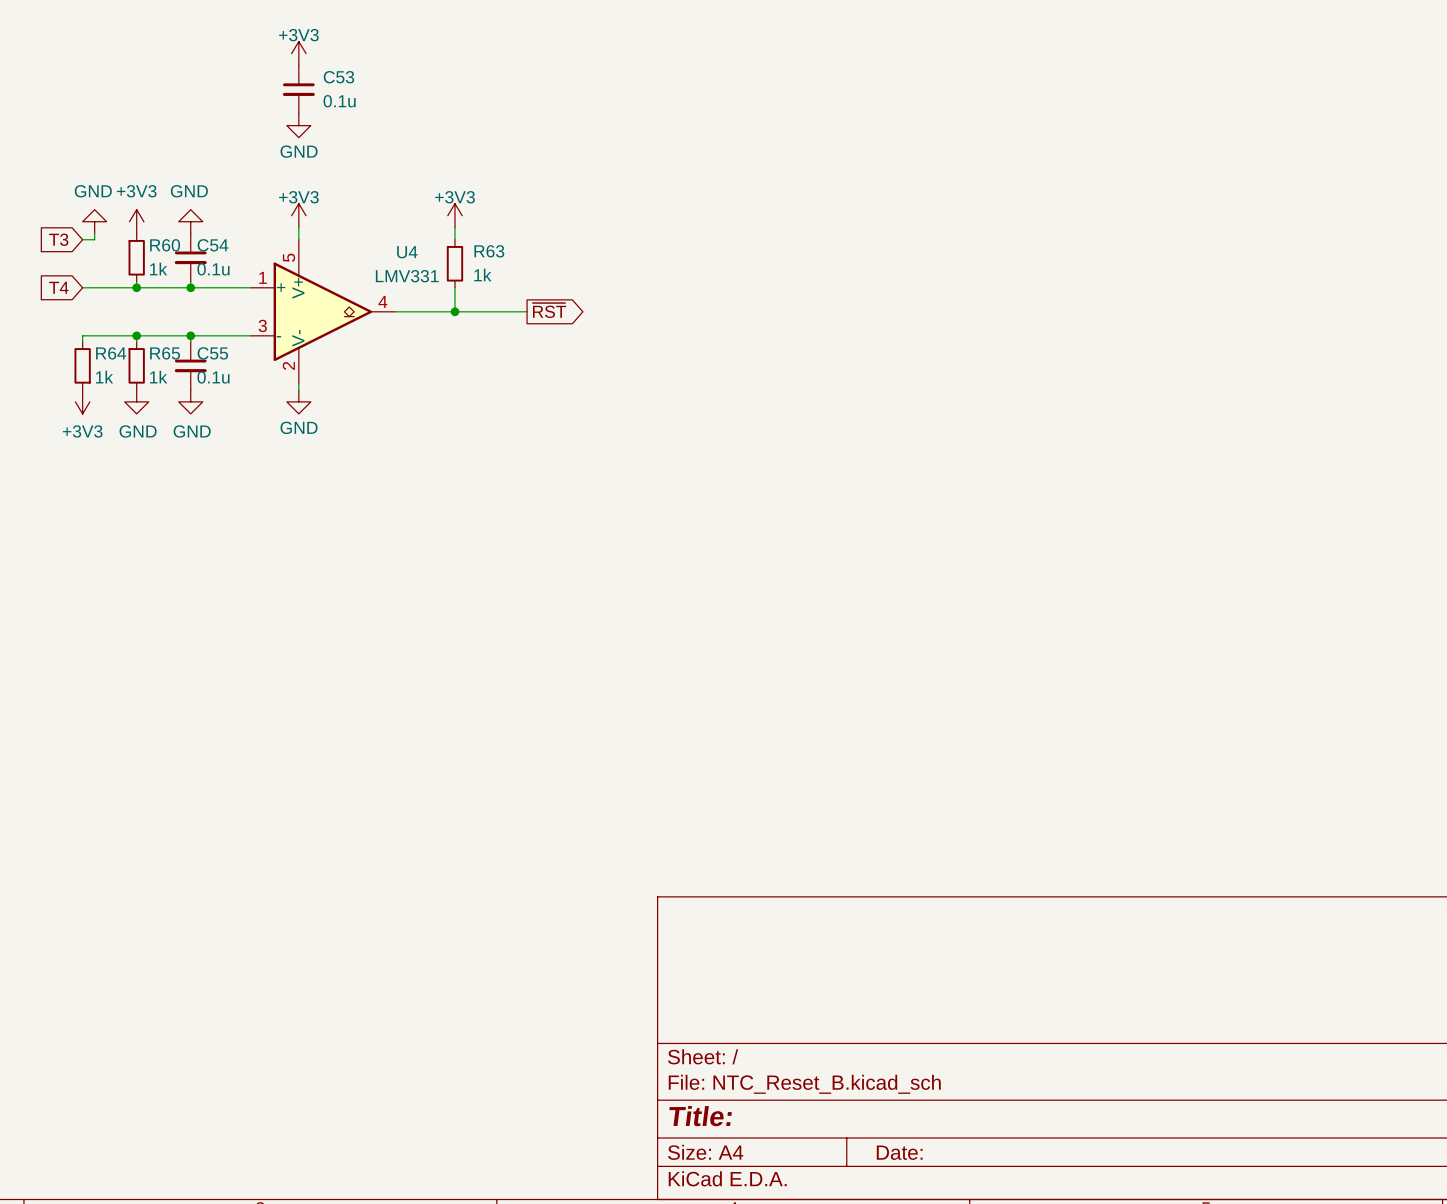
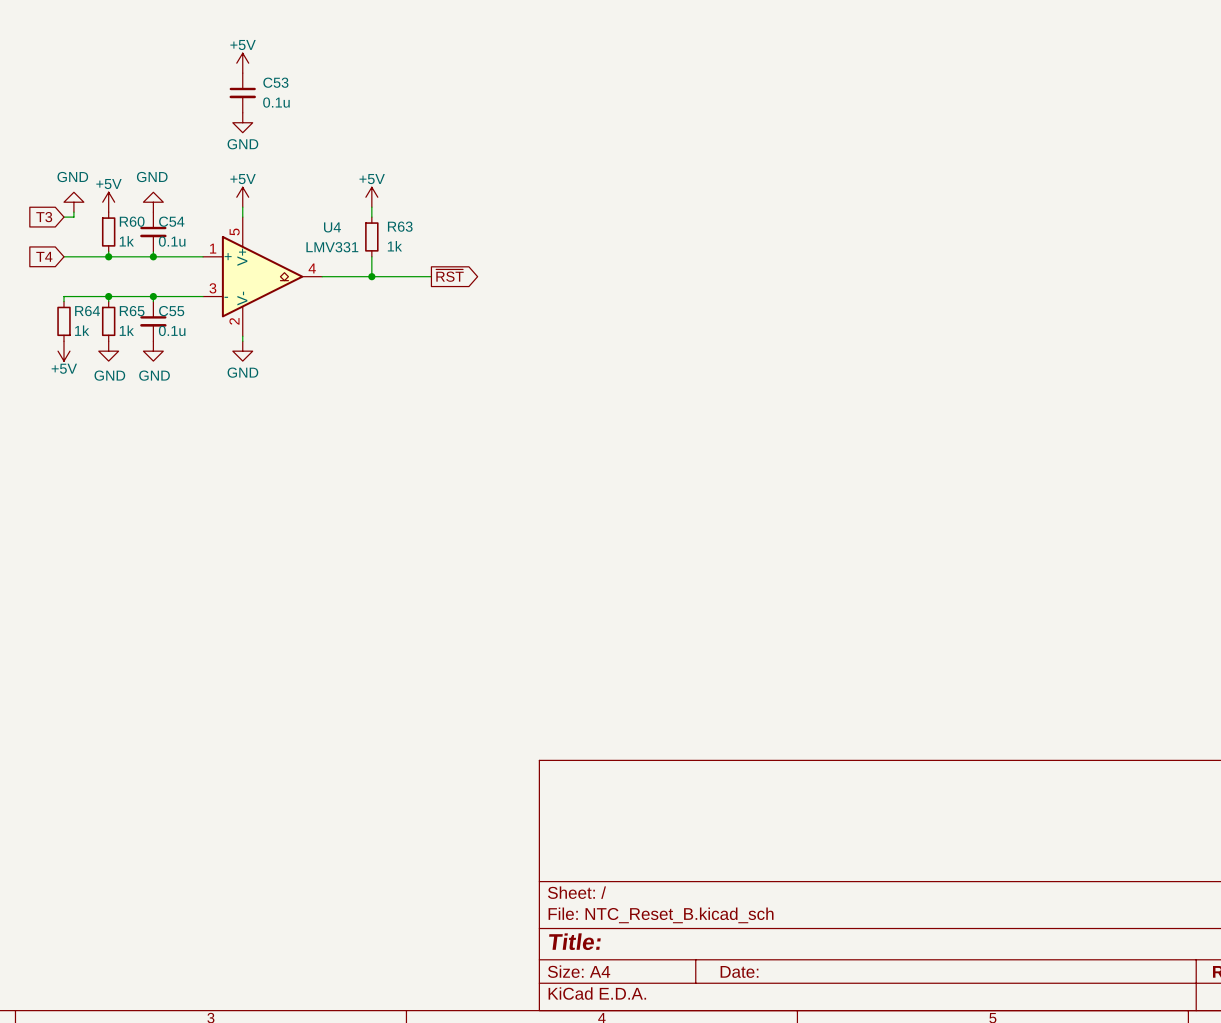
power symbol: +3V3 (298, 53) -> +5V (242, 63)
power symbol: +3V3 (298, 215) -> +5V (242, 197)
power symbol: +3V3 (454, 215) -> +5V (371, 197)
power symbol: +3V3 (136, 221) -> +5V (108, 202)
power symbol: +3V3 (82, 401) -> +5V (63, 351)

